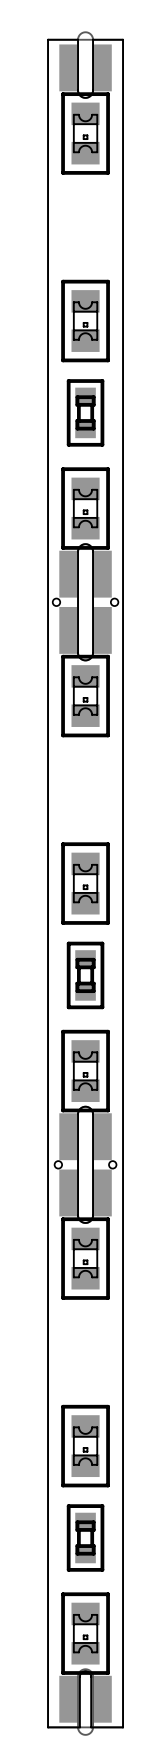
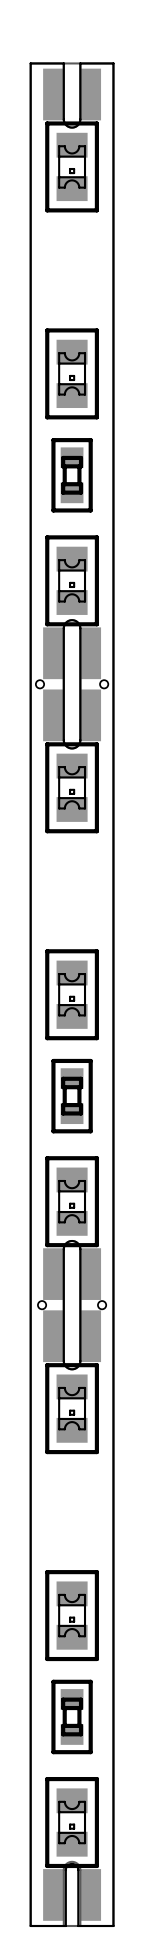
line: (78, 39) (80, 34) (85, 32) (90, 34) (93, 39) -> none
line: (78, 1727) (80, 1732) (85, 1734) (90, 1732) (93, 1727) -> none

